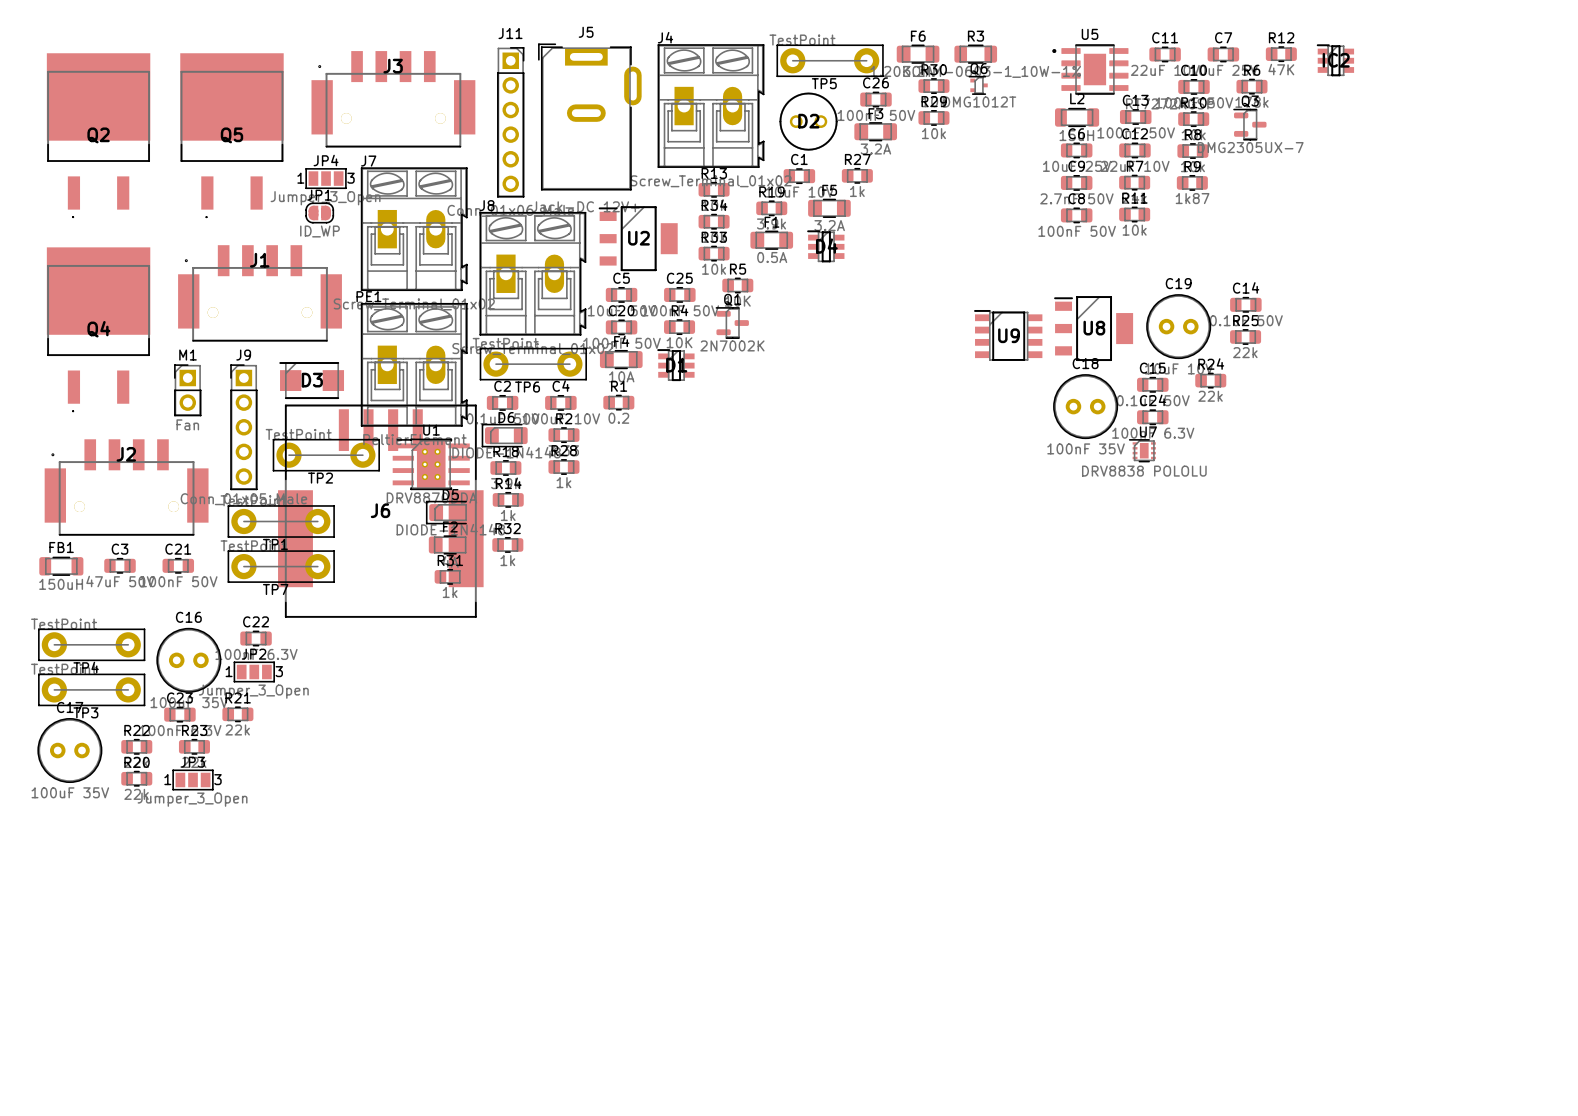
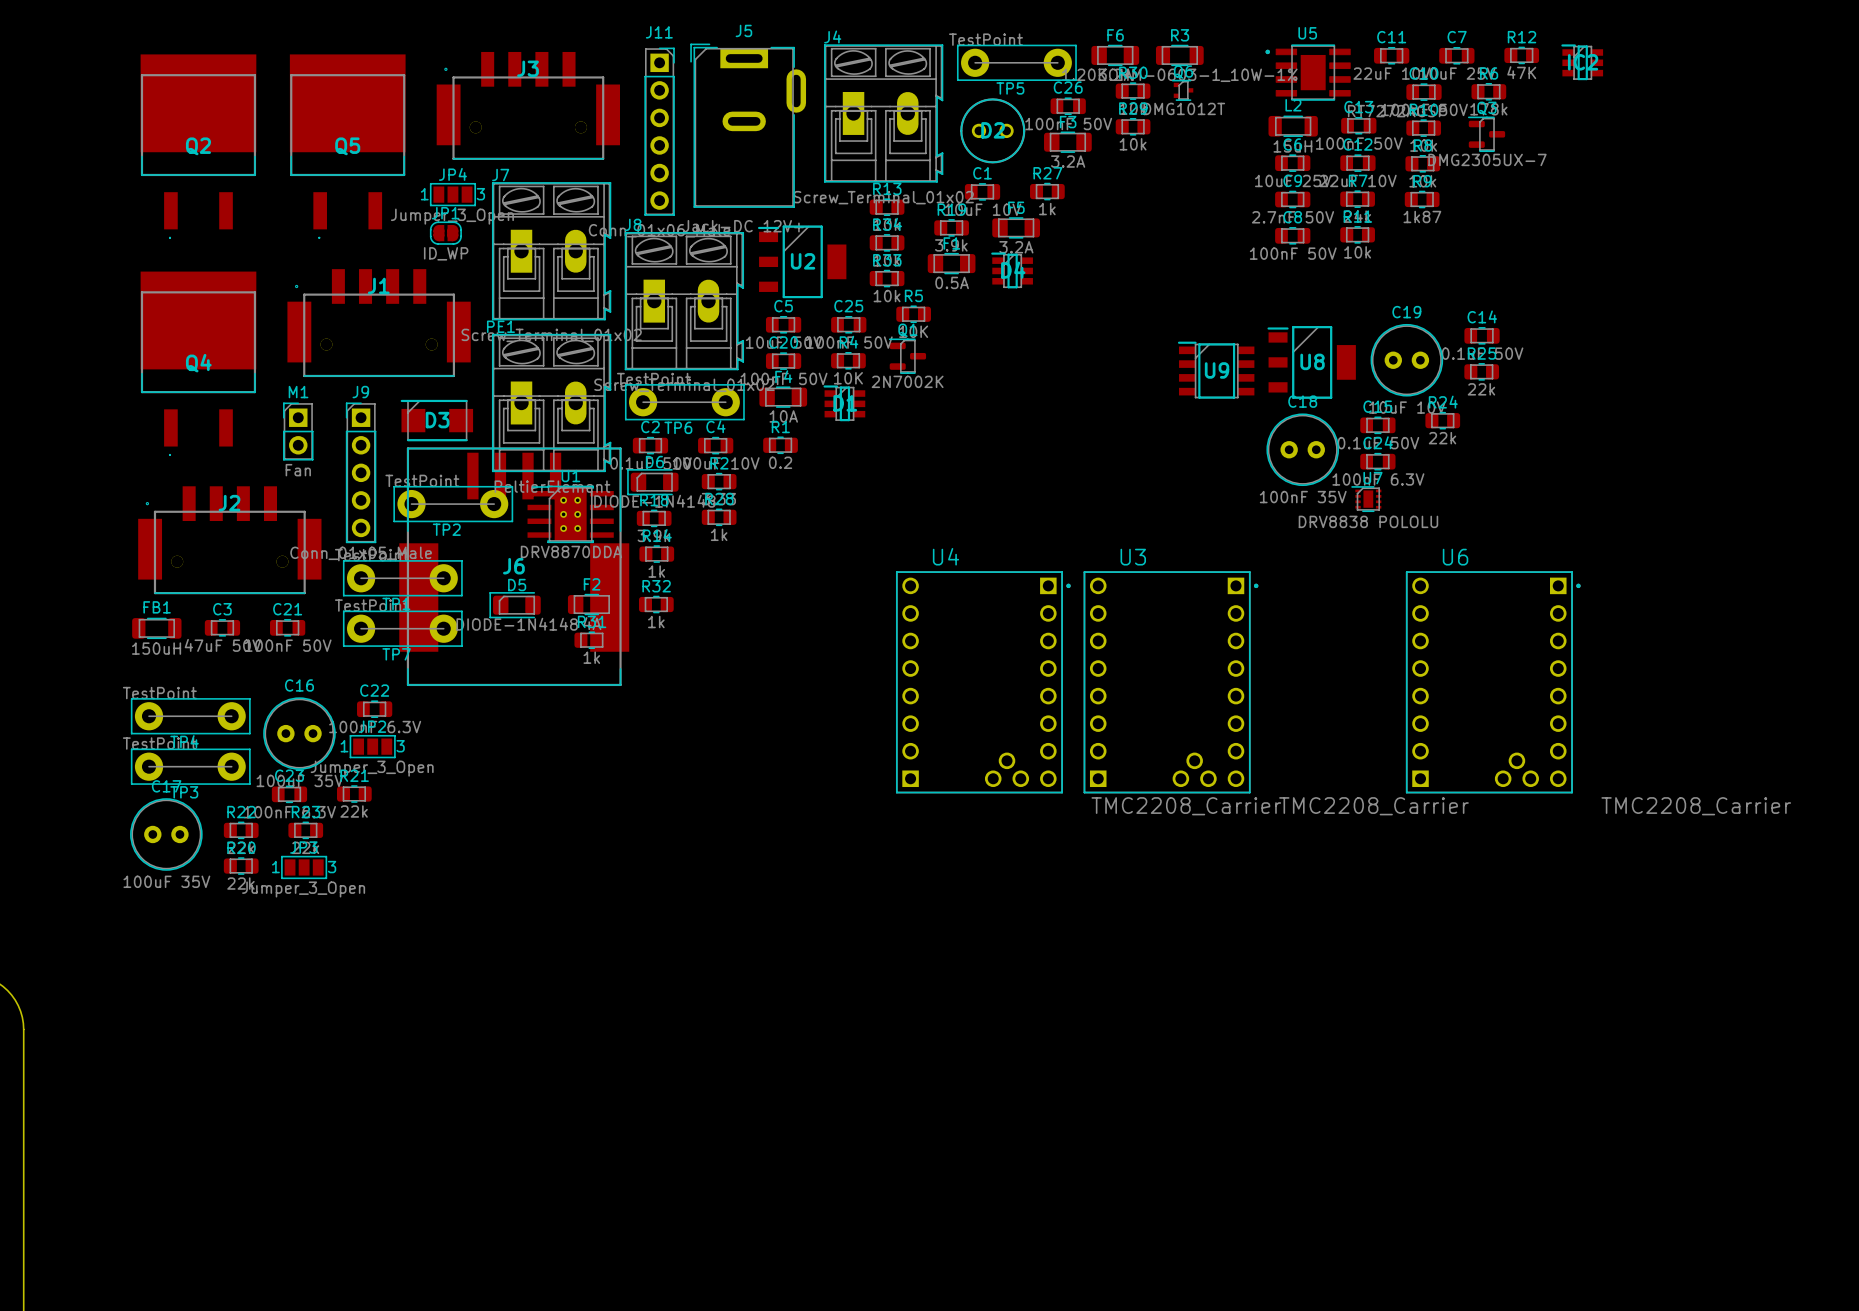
D5 position: (449, 512) -> (515, 605)
U4: none -> TMC2208_Carrier (983, 682)
U3: none -> TMC2208_Carrier (1171, 682)
U6: none -> TMC2208_Carrier (1493, 682)

